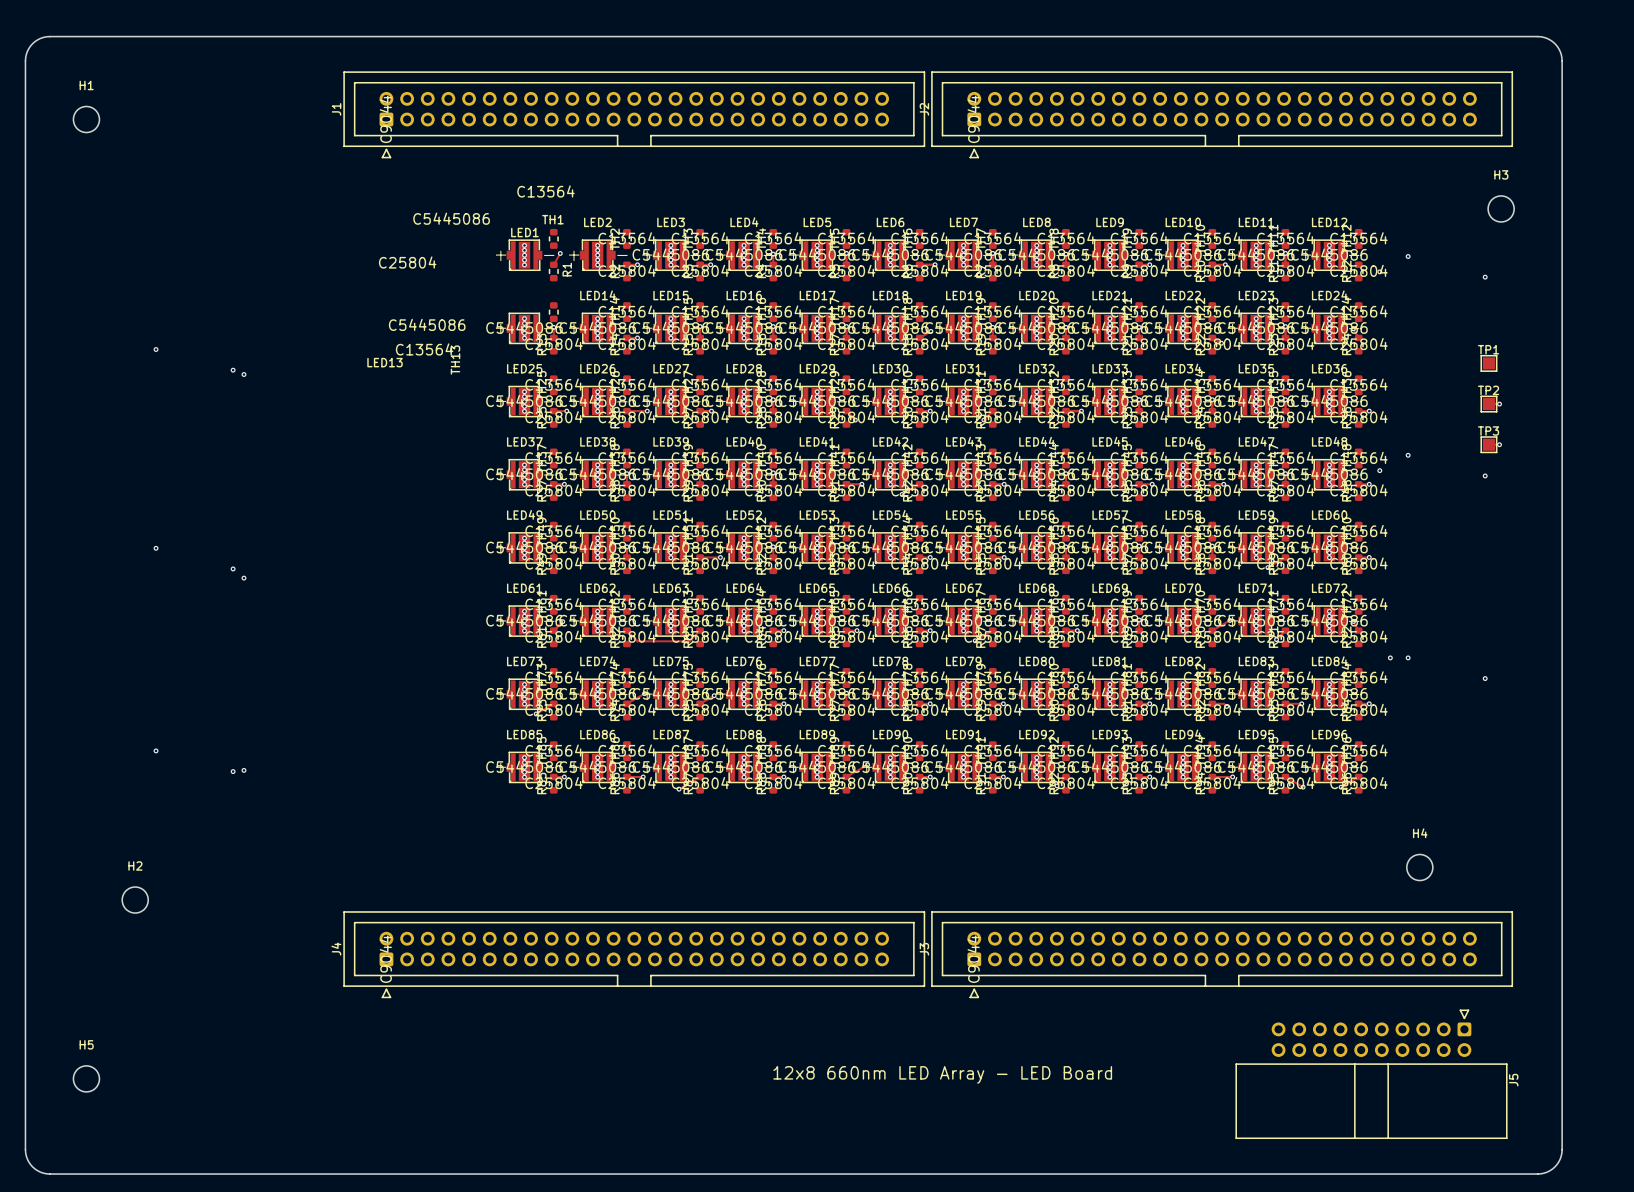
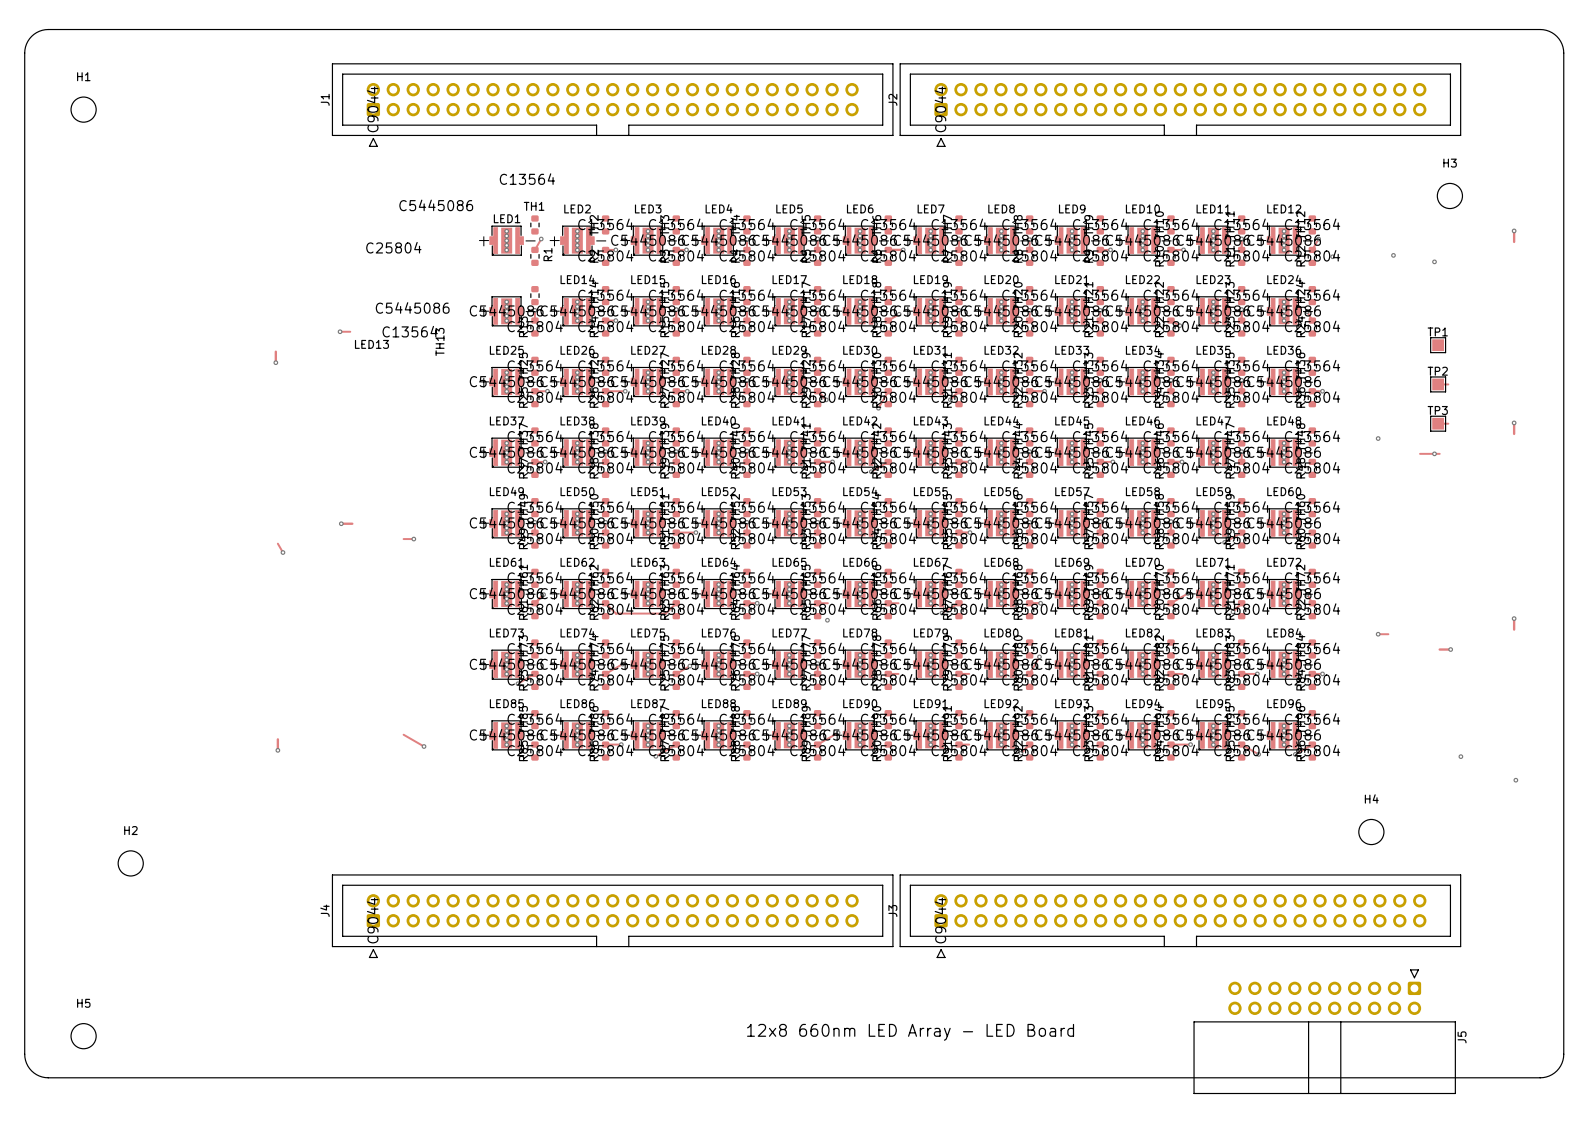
board edge: (1537, 36) (1547, 38) (1554, 43) (1560, 51) (1562, 60) (1562, 1149) (1560, 1158) (1552, 1168) (1537, 1174) (49, 1174) (35, 1168) (26, 1155) (25, 1097) -> (1485, 29) (1546, 30) (1556, 36) (1563, 50) (1563, 1054) (1560, 1066) (1554, 1072) (1540, 1077) (48, 1077) (39, 1076) (31, 1070) (26, 1063) (24, 1054)
track: none -> (1514, 230) (1514, 241)
via: none -> (1514, 230)
track: none -> (1318, 239) (1312, 249)
via: none -> (1318, 239)
via: (1408, 256) -> none
via: none -> (1393, 255)
via: (156, 349) -> none
track: none -> (340, 331) (350, 331)
via: none -> (340, 331)
via: (233, 370) -> none
track: none -> (275, 351) (275, 362)
via: (243, 374) -> none
via: none -> (275, 362)
via: (1499, 404) -> none
track: (919, 411) (930, 411) -> (888, 391) (878, 408)
via position: (930, 411) -> (878, 408)
track: none -> (1514, 422) (1514, 433)
via: none -> (1514, 422)
via: (1499, 444) -> none
via position: (1408, 455) -> (1378, 438)
via: (1379, 470) -> none
track: none -> (1420, 453) (1439, 453)
track: (1358, 484) (1369, 484) -> none
via: (1369, 484) -> none
via: (156, 548) -> none
track: none -> (341, 523) (352, 523)
via: none -> (341, 523)
track: (919, 557) (930, 557) -> none
via: (930, 557) -> none
track: (1358, 557) (1369, 557) -> (1378, 634) (1388, 634)
via: (1369, 557) -> none
track: none -> (403, 539) (413, 539)
via: none -> (413, 539)
via: (233, 568) -> none
track: none -> (277, 543) (282, 552)
via: (243, 578) -> none
via: none -> (282, 552)
via position: (857, 630) -> (827, 620)
via: (930, 630) -> none
track: none -> (1514, 618) (1514, 629)
via: none -> (1514, 618)
via: (1390, 657) -> none
via: (1408, 657) -> none
via: none -> (1378, 634)
via position: (1485, 678) -> (1450, 649)
track: none -> (1439, 649) (1450, 649)
via: (930, 703) -> none
via: (1003, 703) -> none
track: (1139, 703) (1149, 703) -> none
via: (1149, 703) -> none
via: (156, 750) -> none
track: none -> (403, 734) (424, 746)
via: (243, 770) -> none
via: (233, 771) -> none
track: none -> (277, 739) (277, 750)
track: (553, 776) (564, 776) -> none
via: (564, 776) -> none
track: (773, 776) (783, 776) -> none
via: (783, 776) -> none
track: (919, 776) (930, 776) -> none
via: (930, 776) -> none
via: (1003, 776) -> none
track: (1139, 776) (1149, 776) -> none
via: (1149, 776) -> none
via: none -> (424, 746)
via: none -> (277, 750)
via: none -> (1460, 756)
via: none -> (1515, 780)

